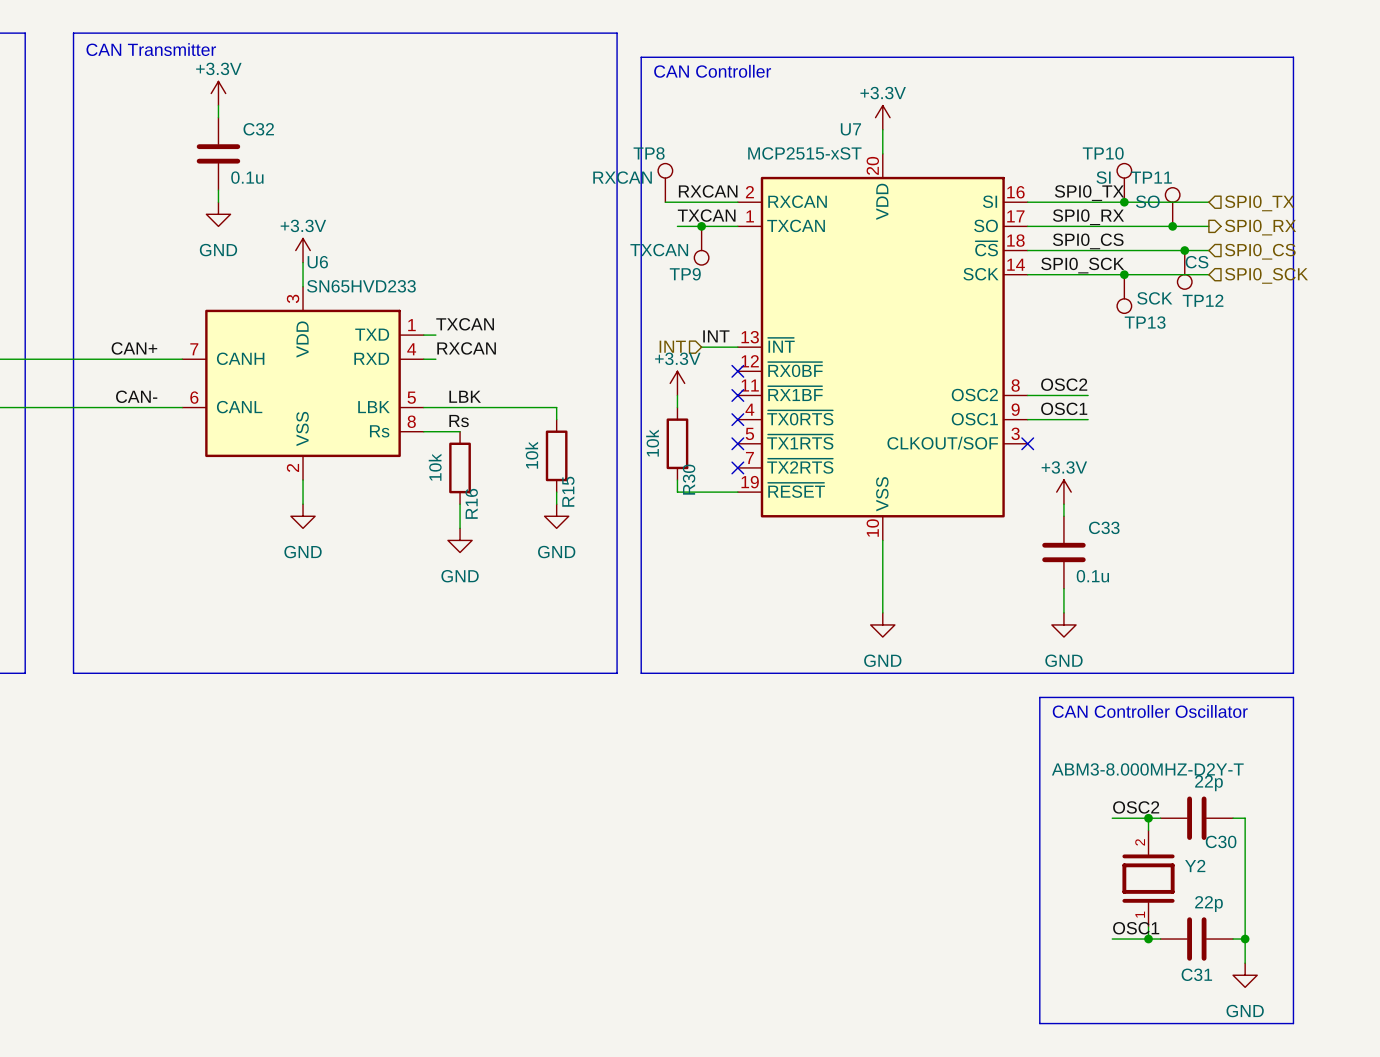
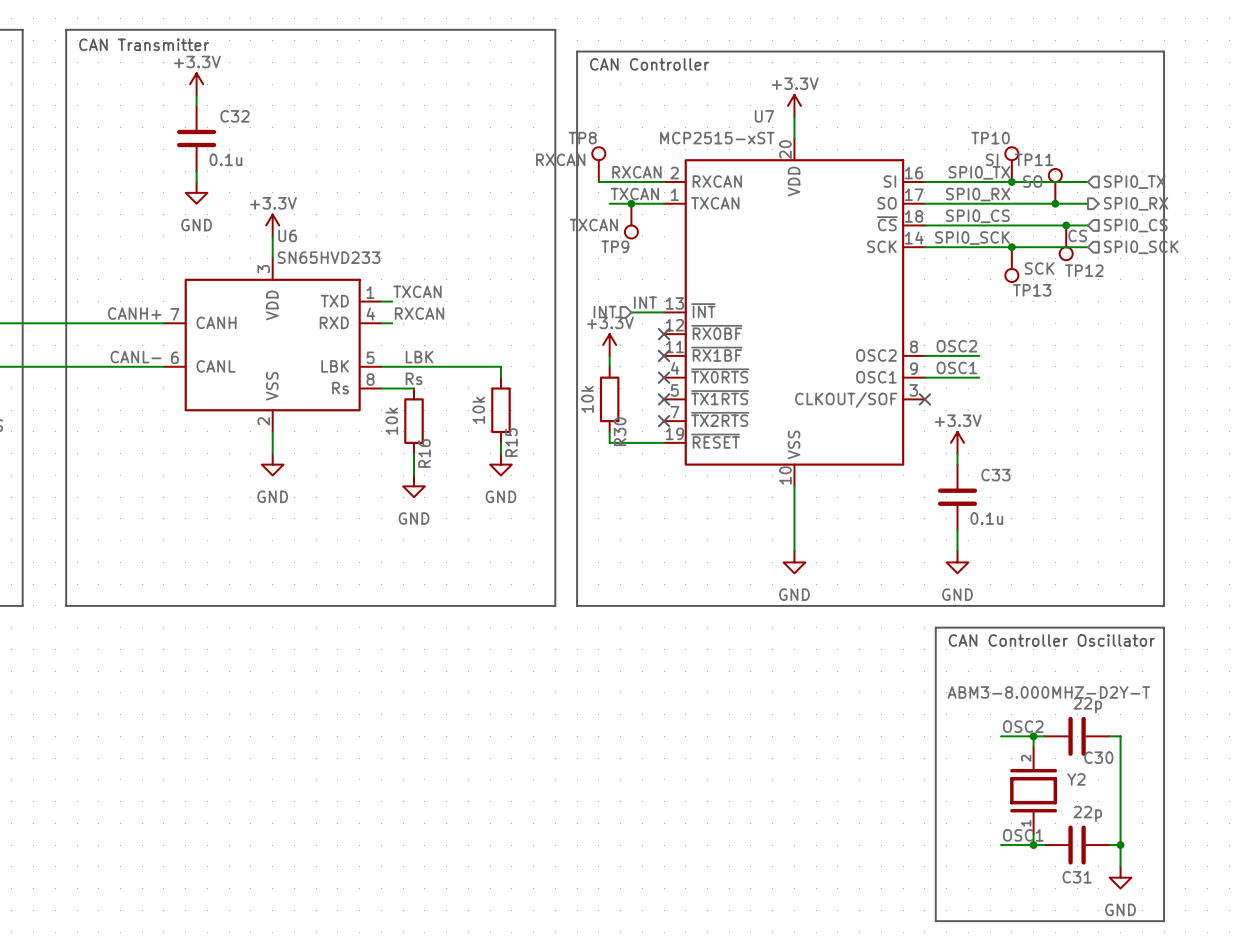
label: CAN+ (134, 348) -> CANH+ (134, 313)
label: CAN- (136, 396) -> CANL- (135, 357)

